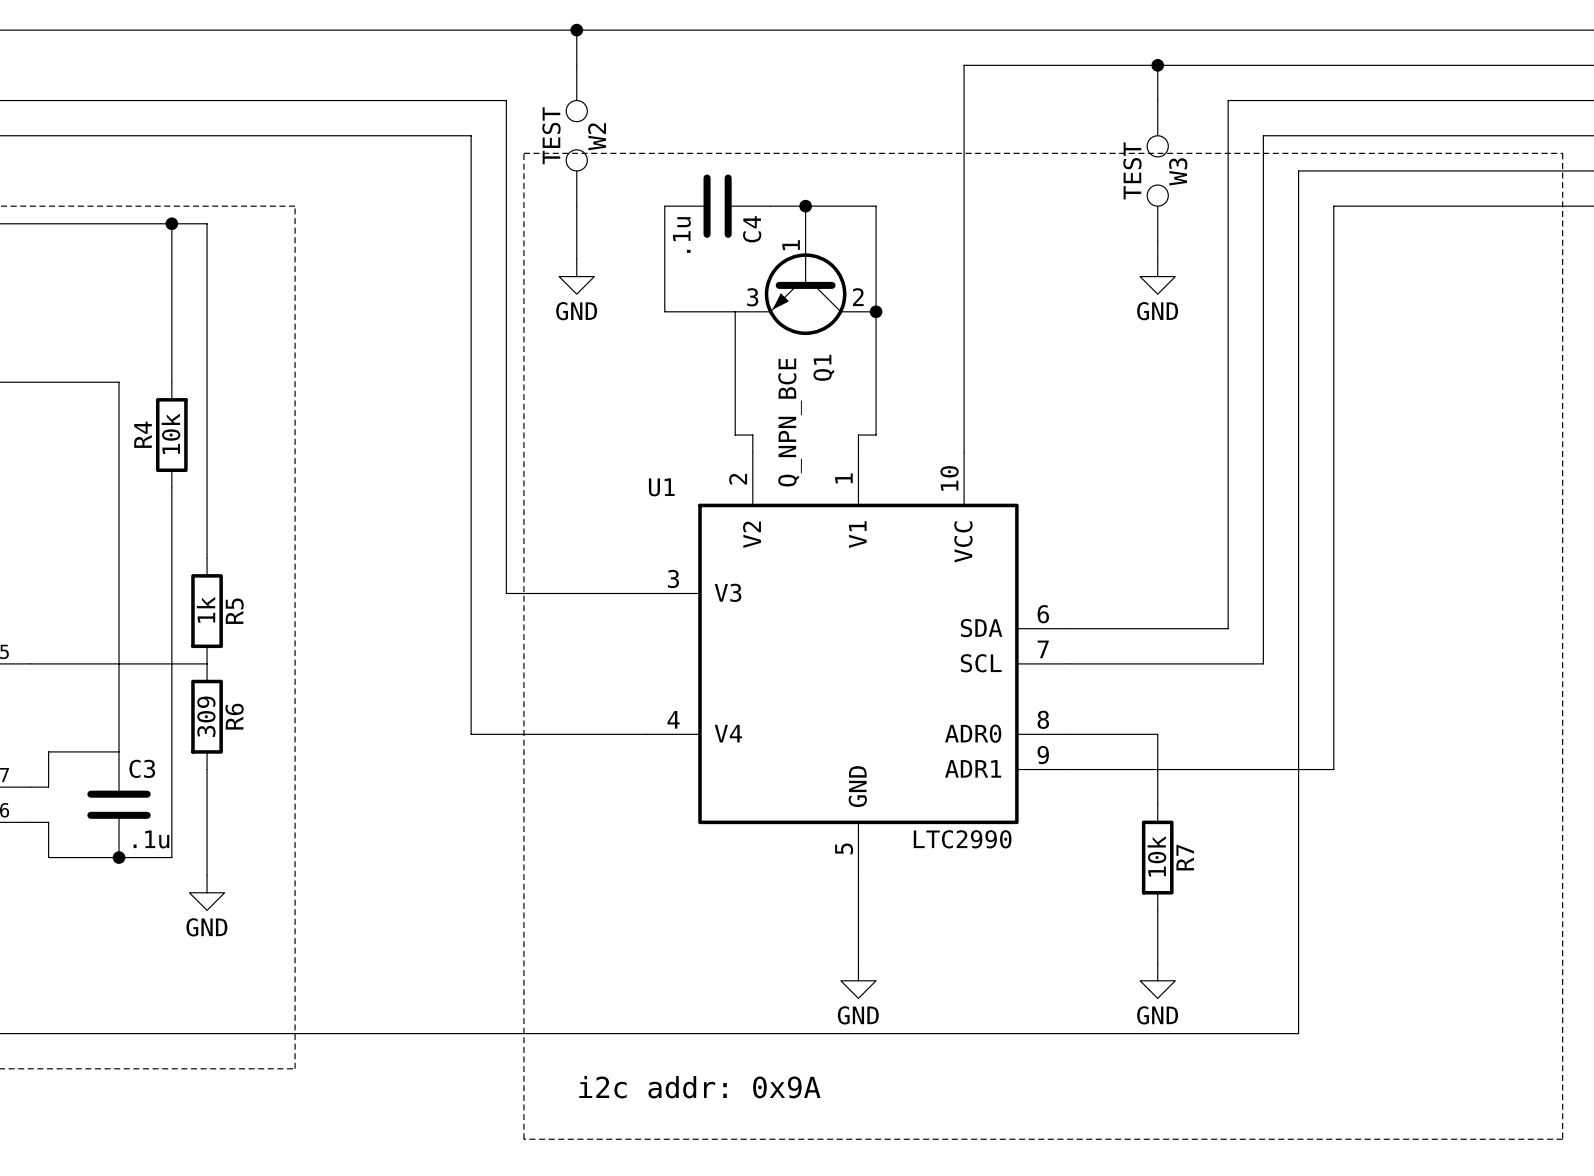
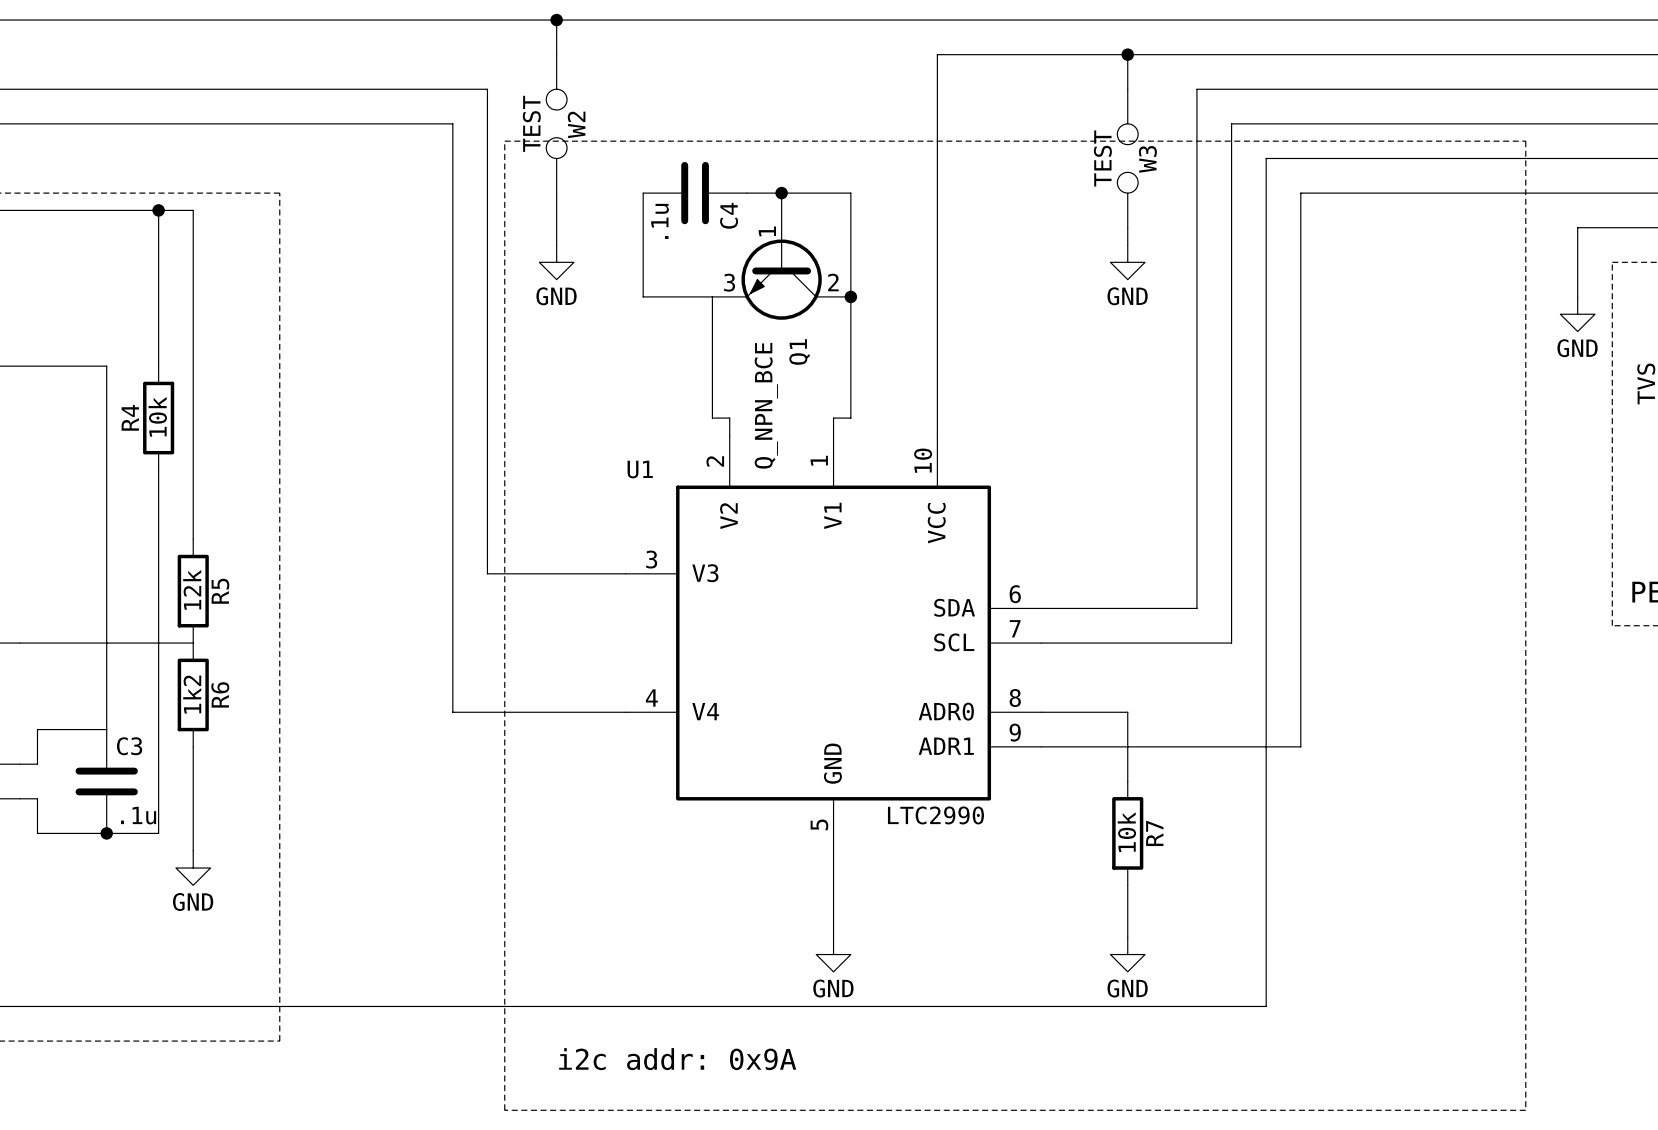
R5 value: 1k (206, 609) -> 12k (192, 589)
R6 value: 309 (206, 716) -> 1k2 (192, 694)

